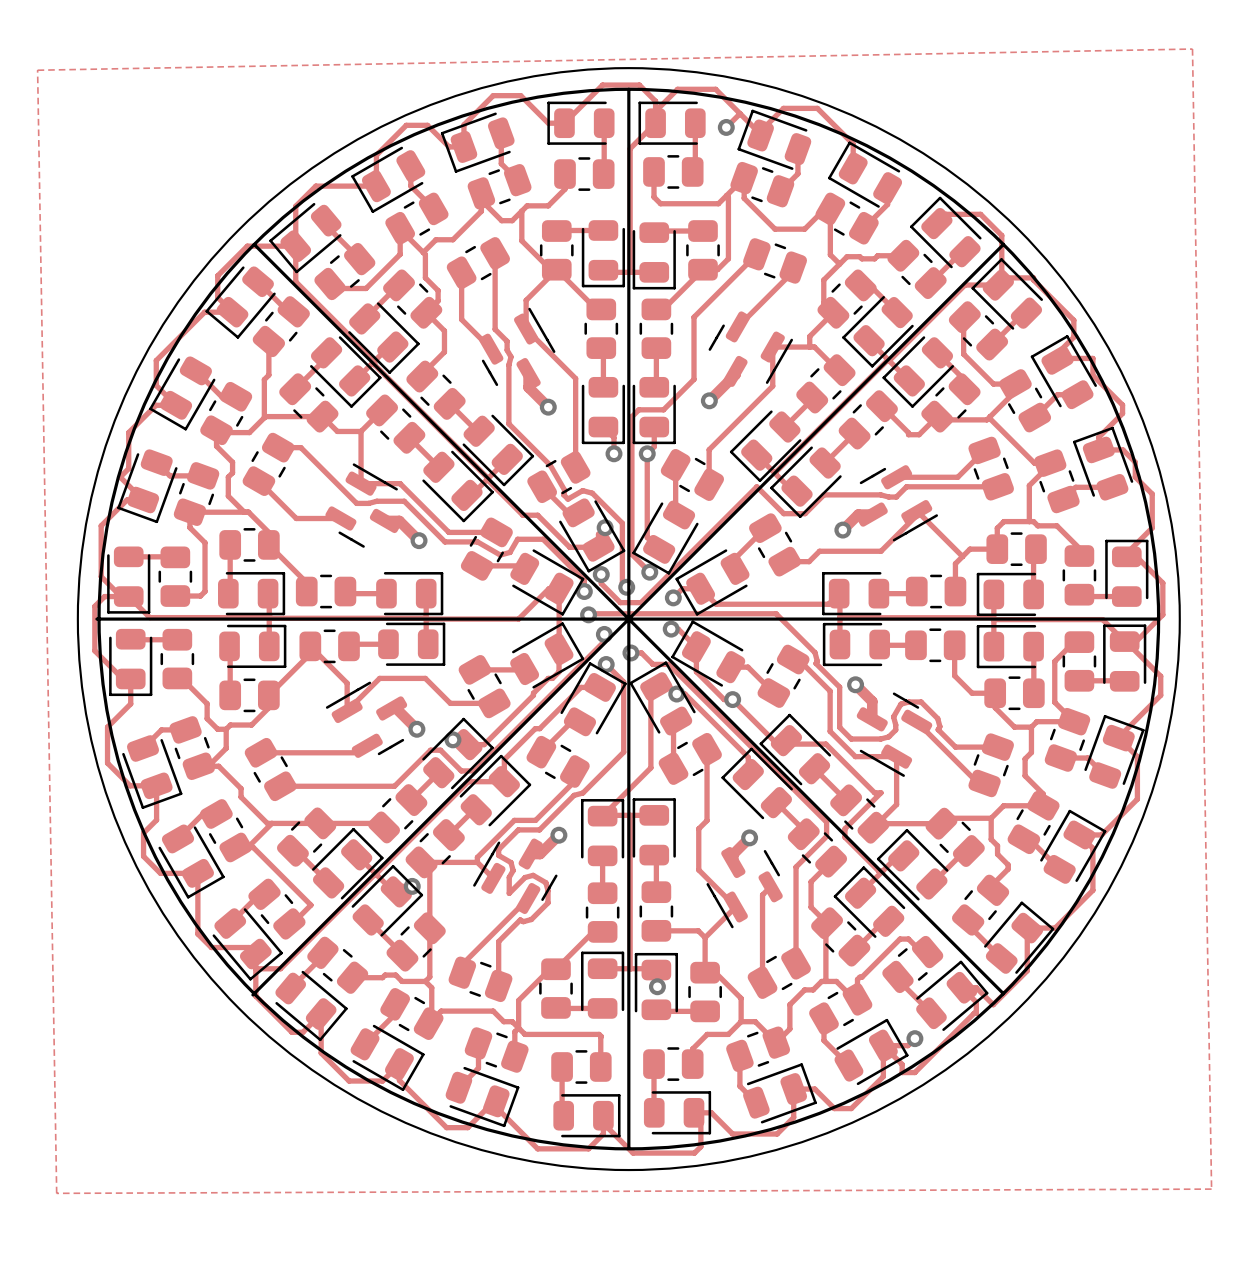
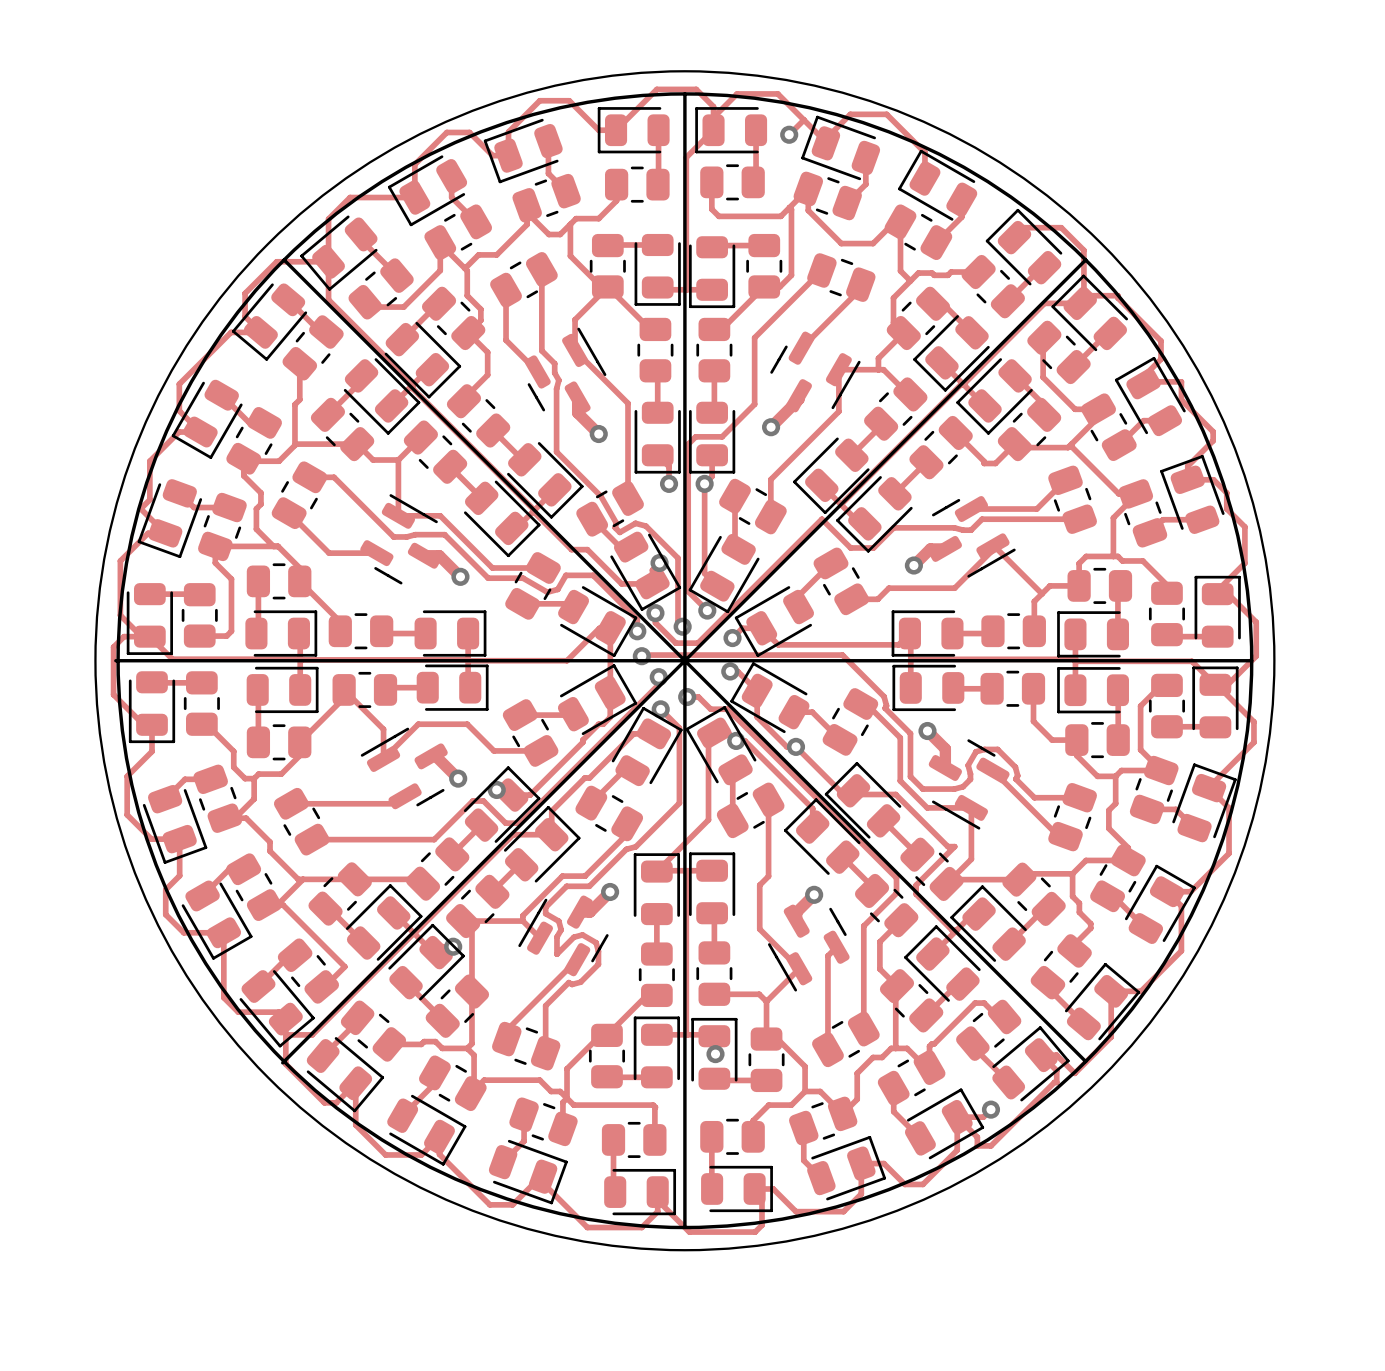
zone outline: (1192, 49) (37, 70) (56, 1193) (1211, 1189) (1192, 49) -> none

